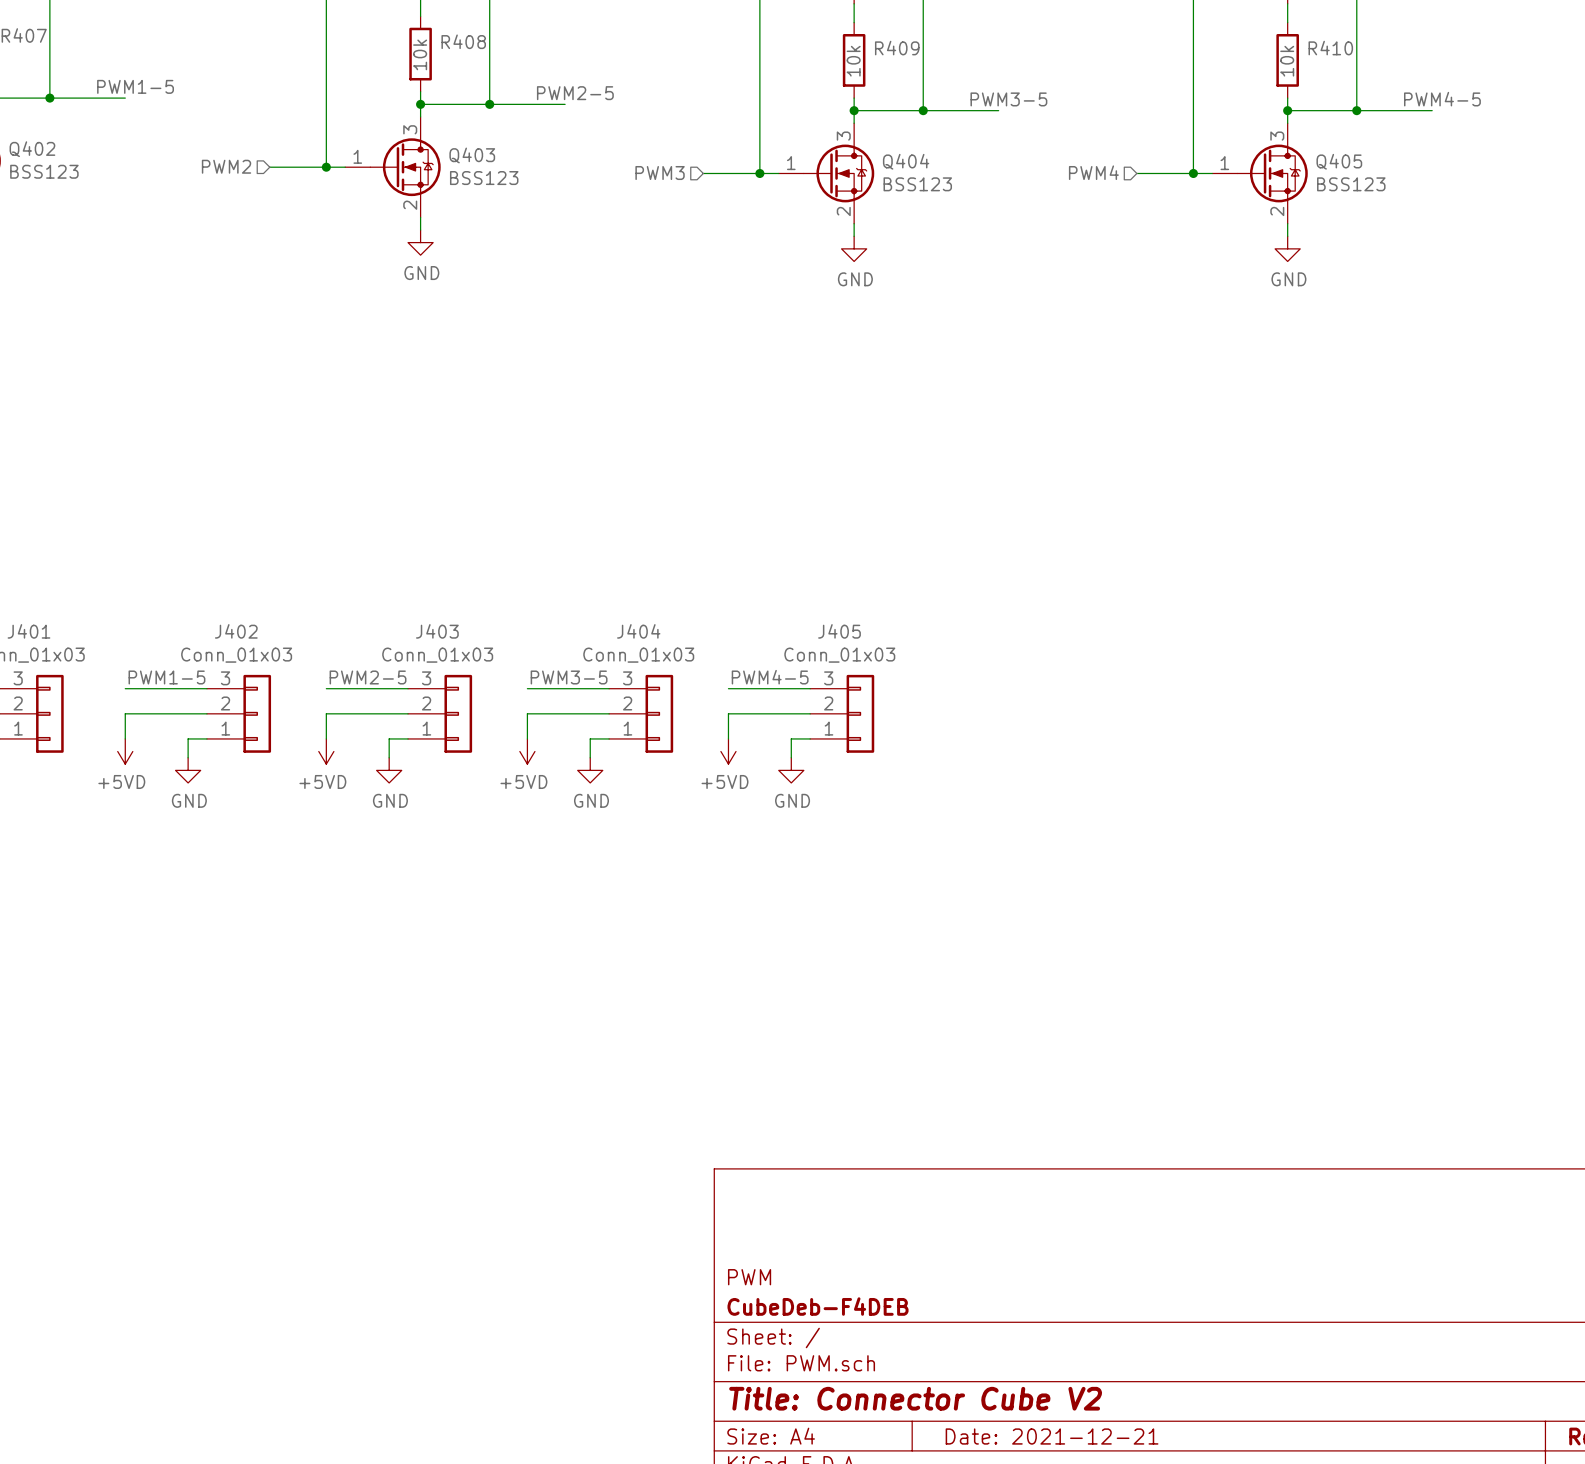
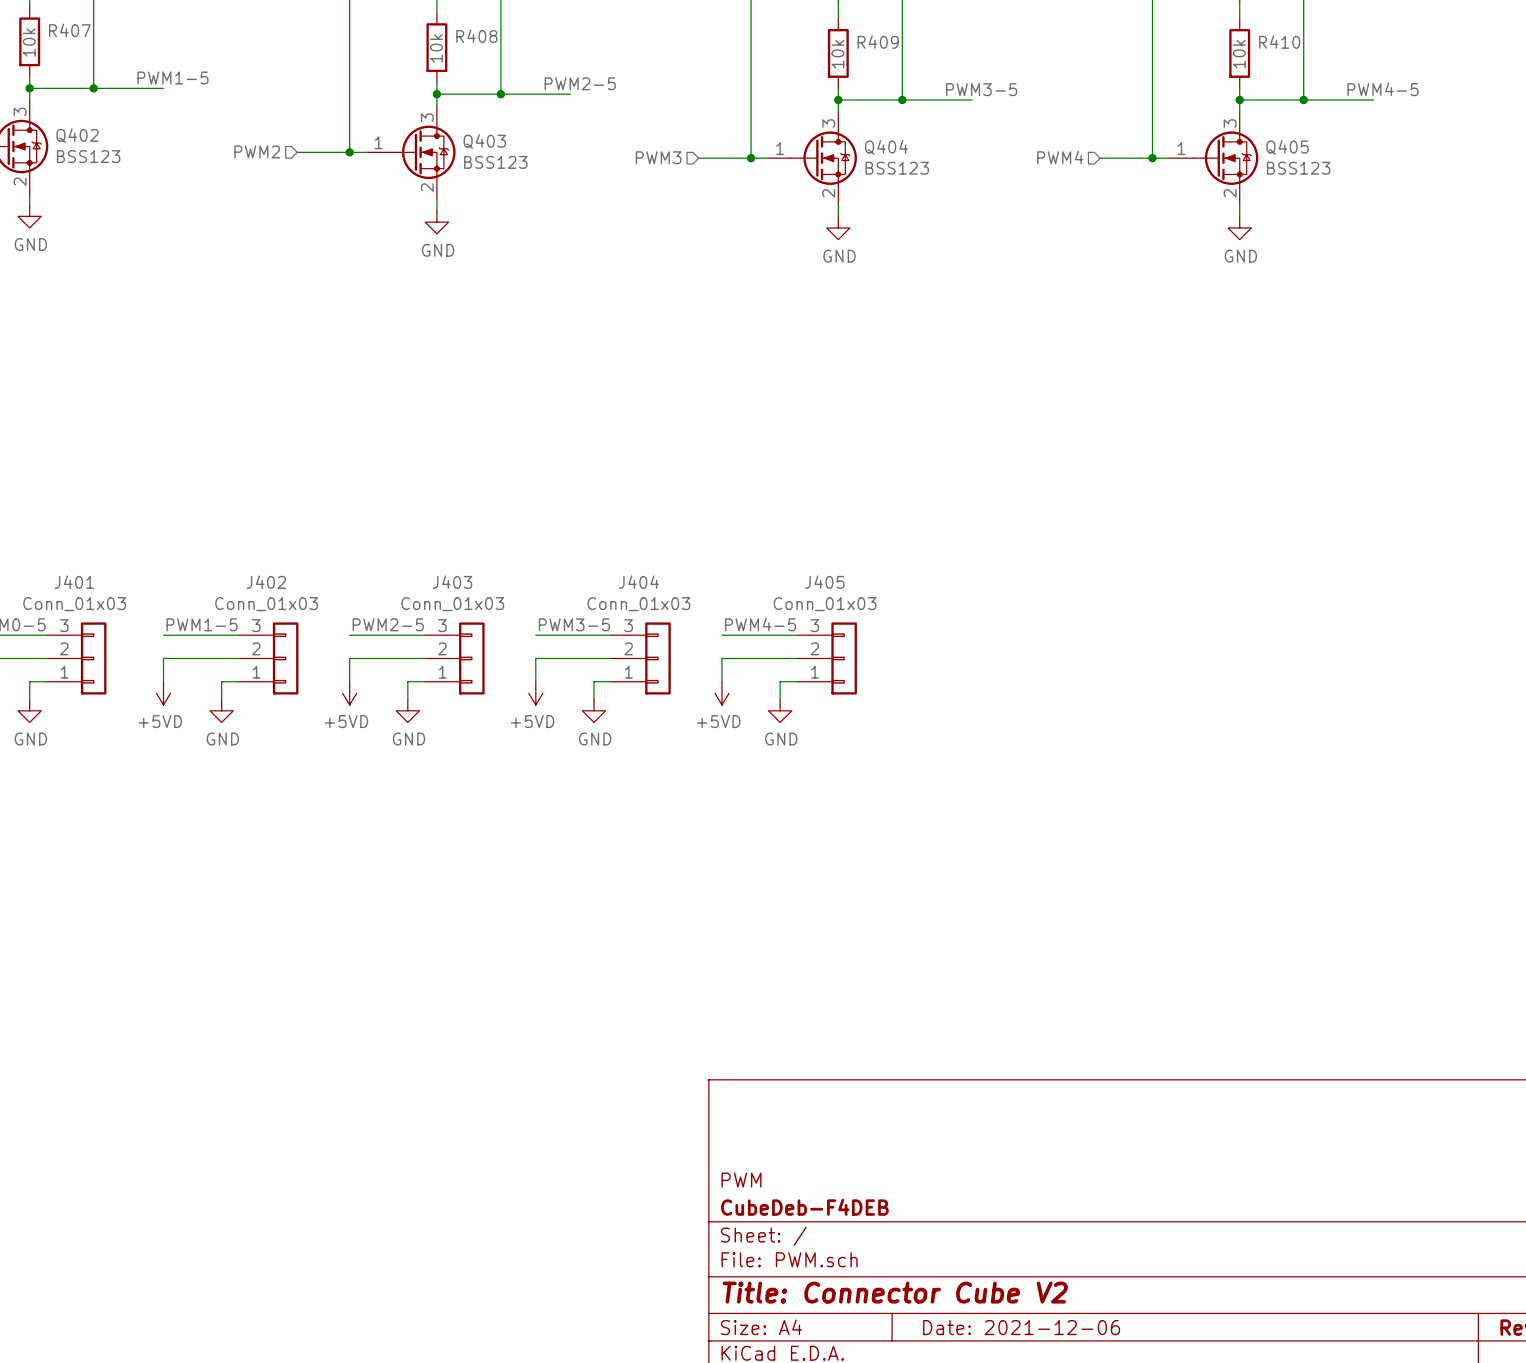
title block: Date: 2021-12-21 (1052, 1436) -> Date: 2021-12-06 (1021, 1327)

